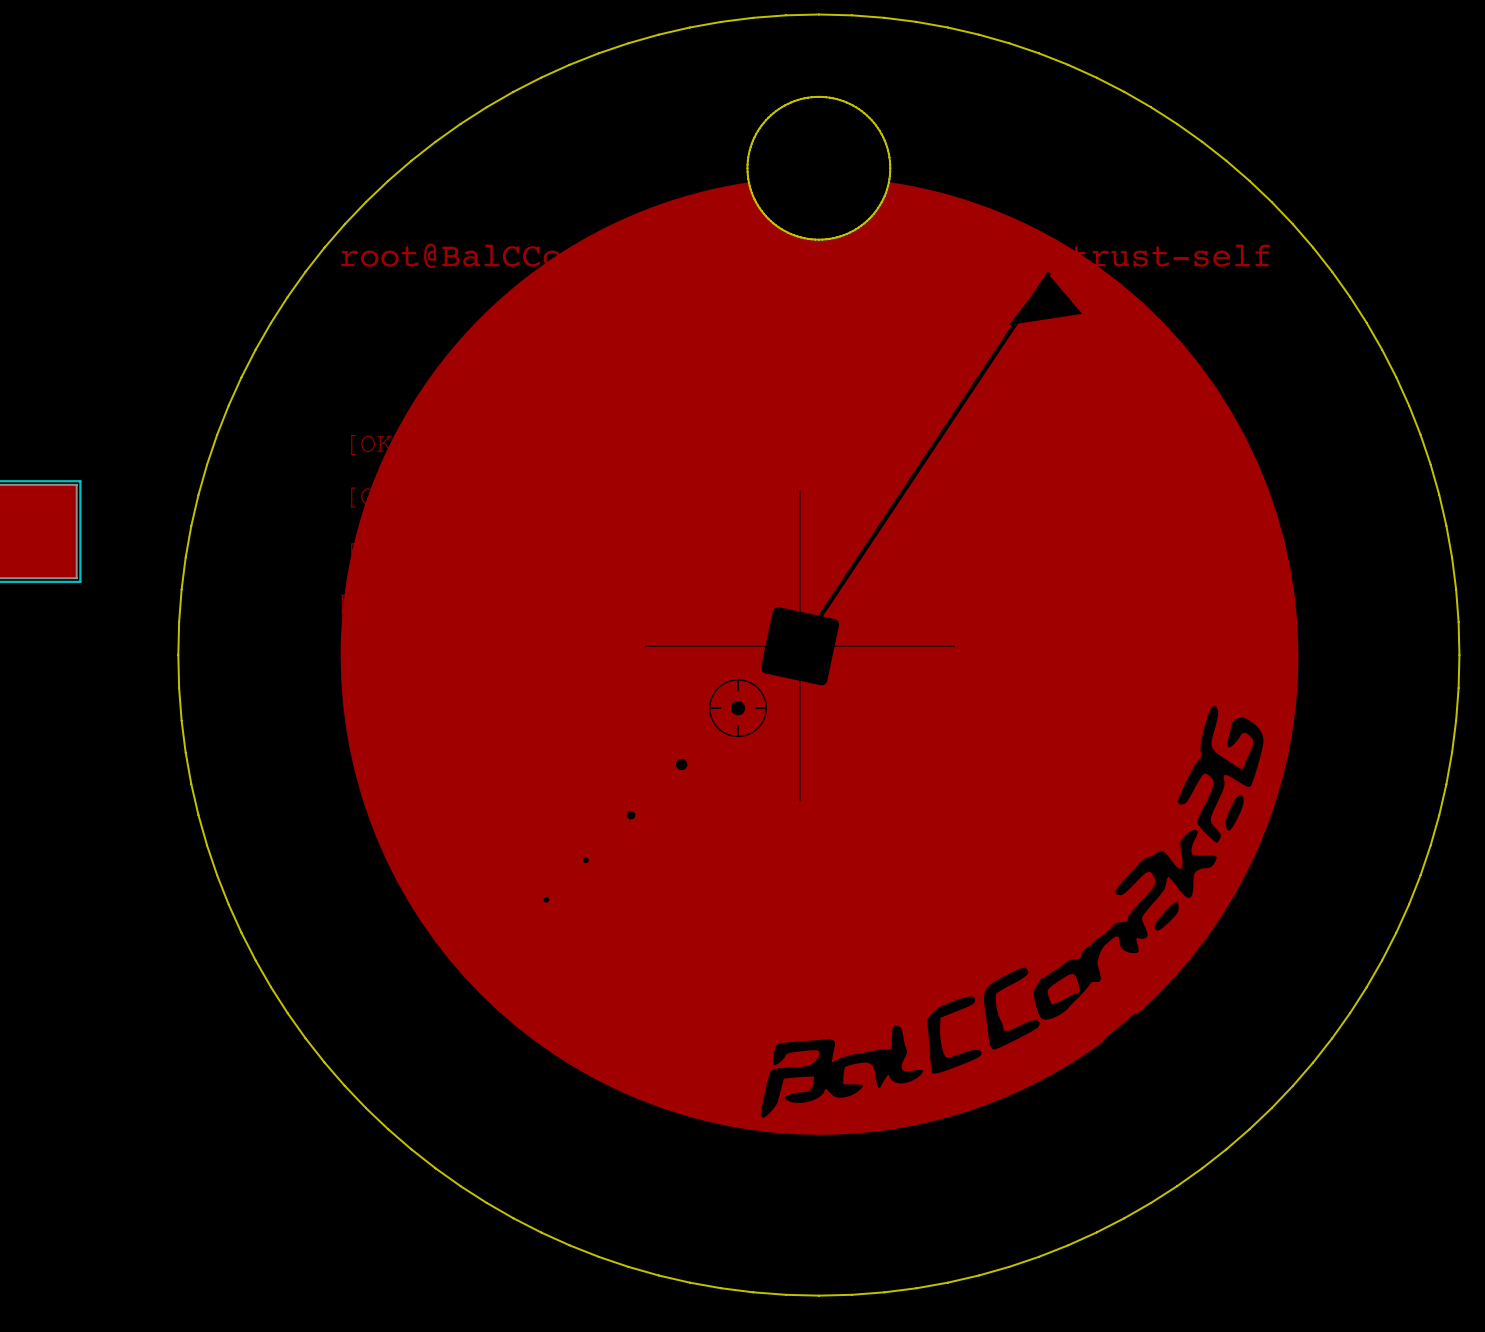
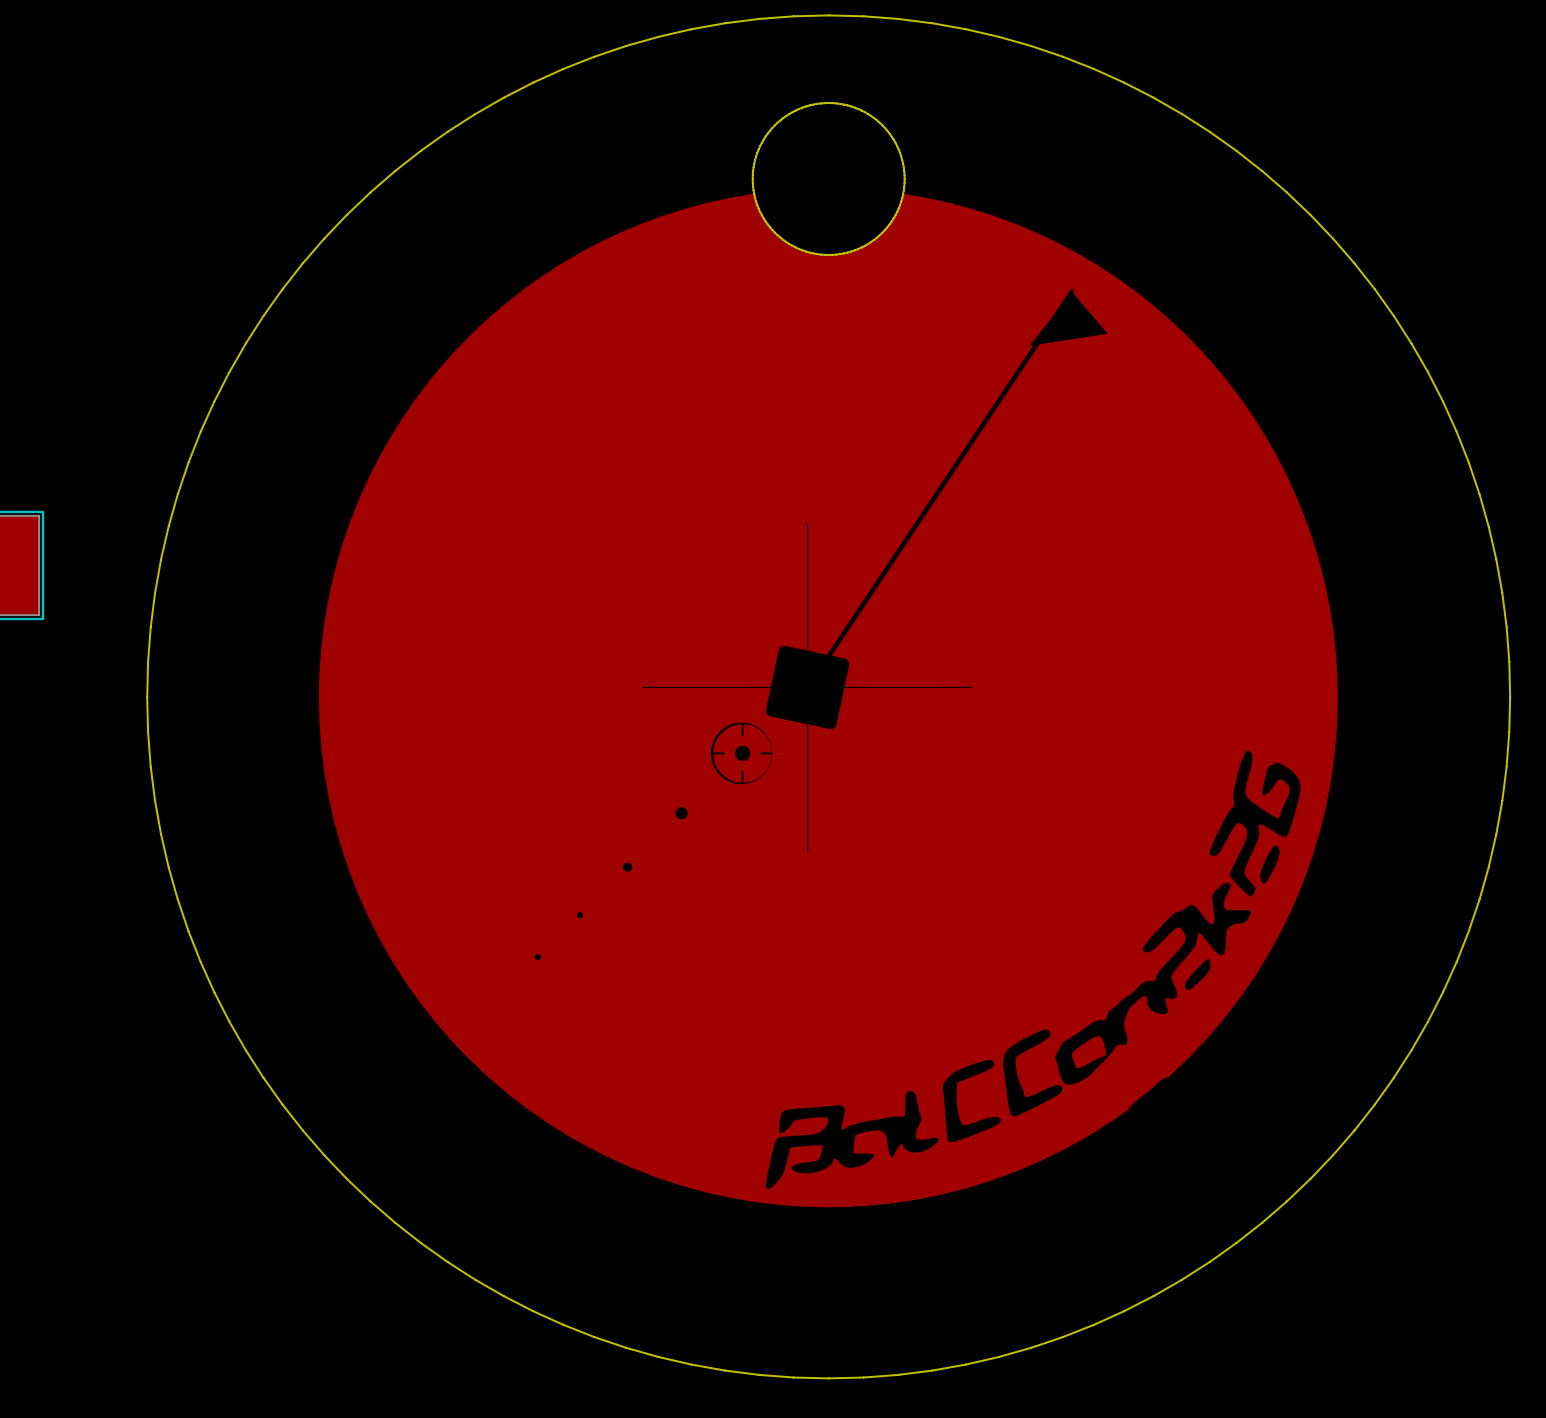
drawing shape: [340, 182, 1299, 1135] -> [318, 193, 1338, 1208]
drawing: [341, 243, 541, 269] -> none
drawing: [1111, 244, 1271, 267] -> none
drawing: [351, 434, 375, 456] -> none
drawing: [351, 487, 356, 508] -> none

